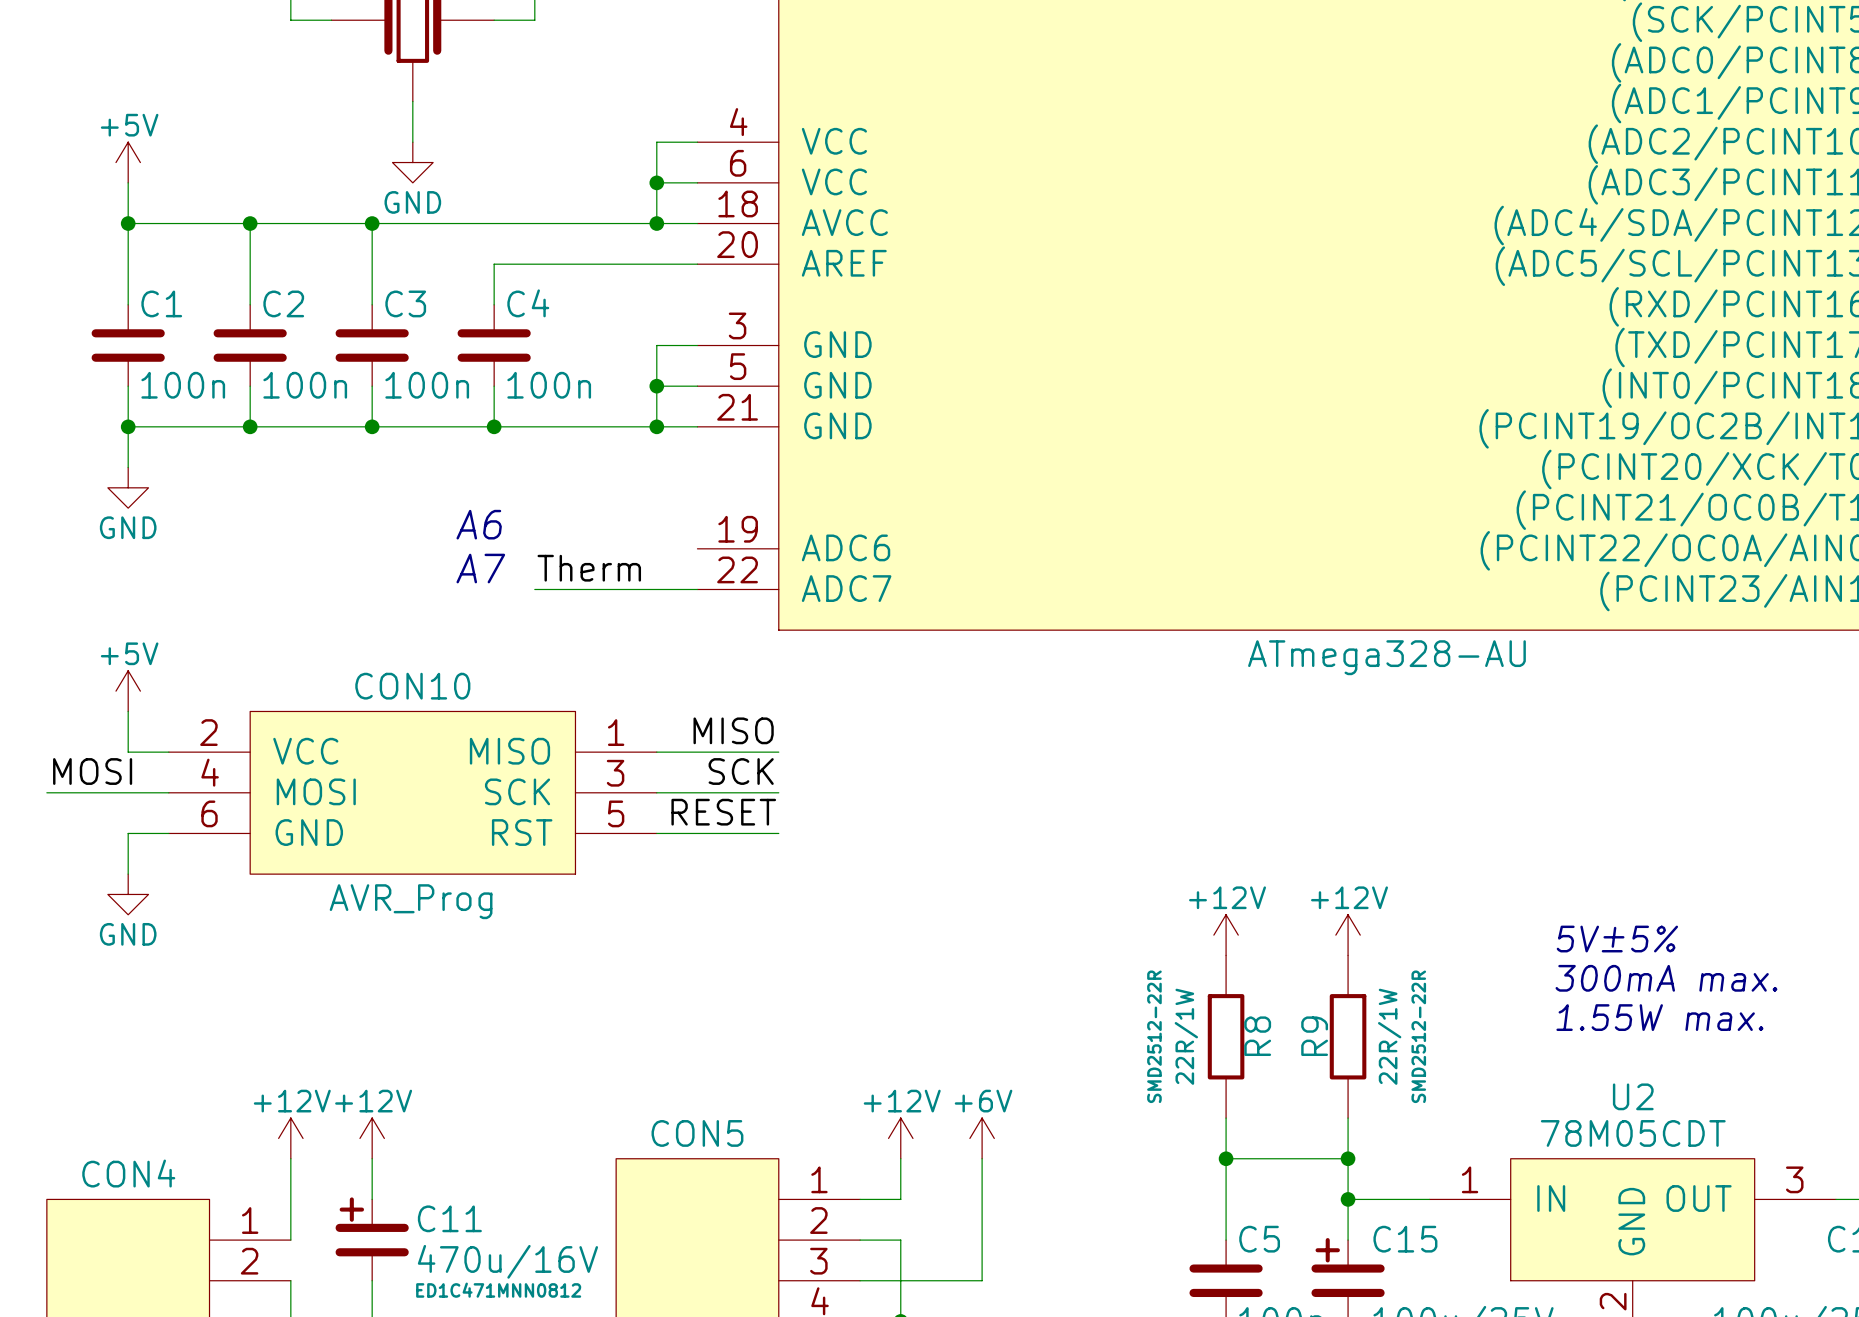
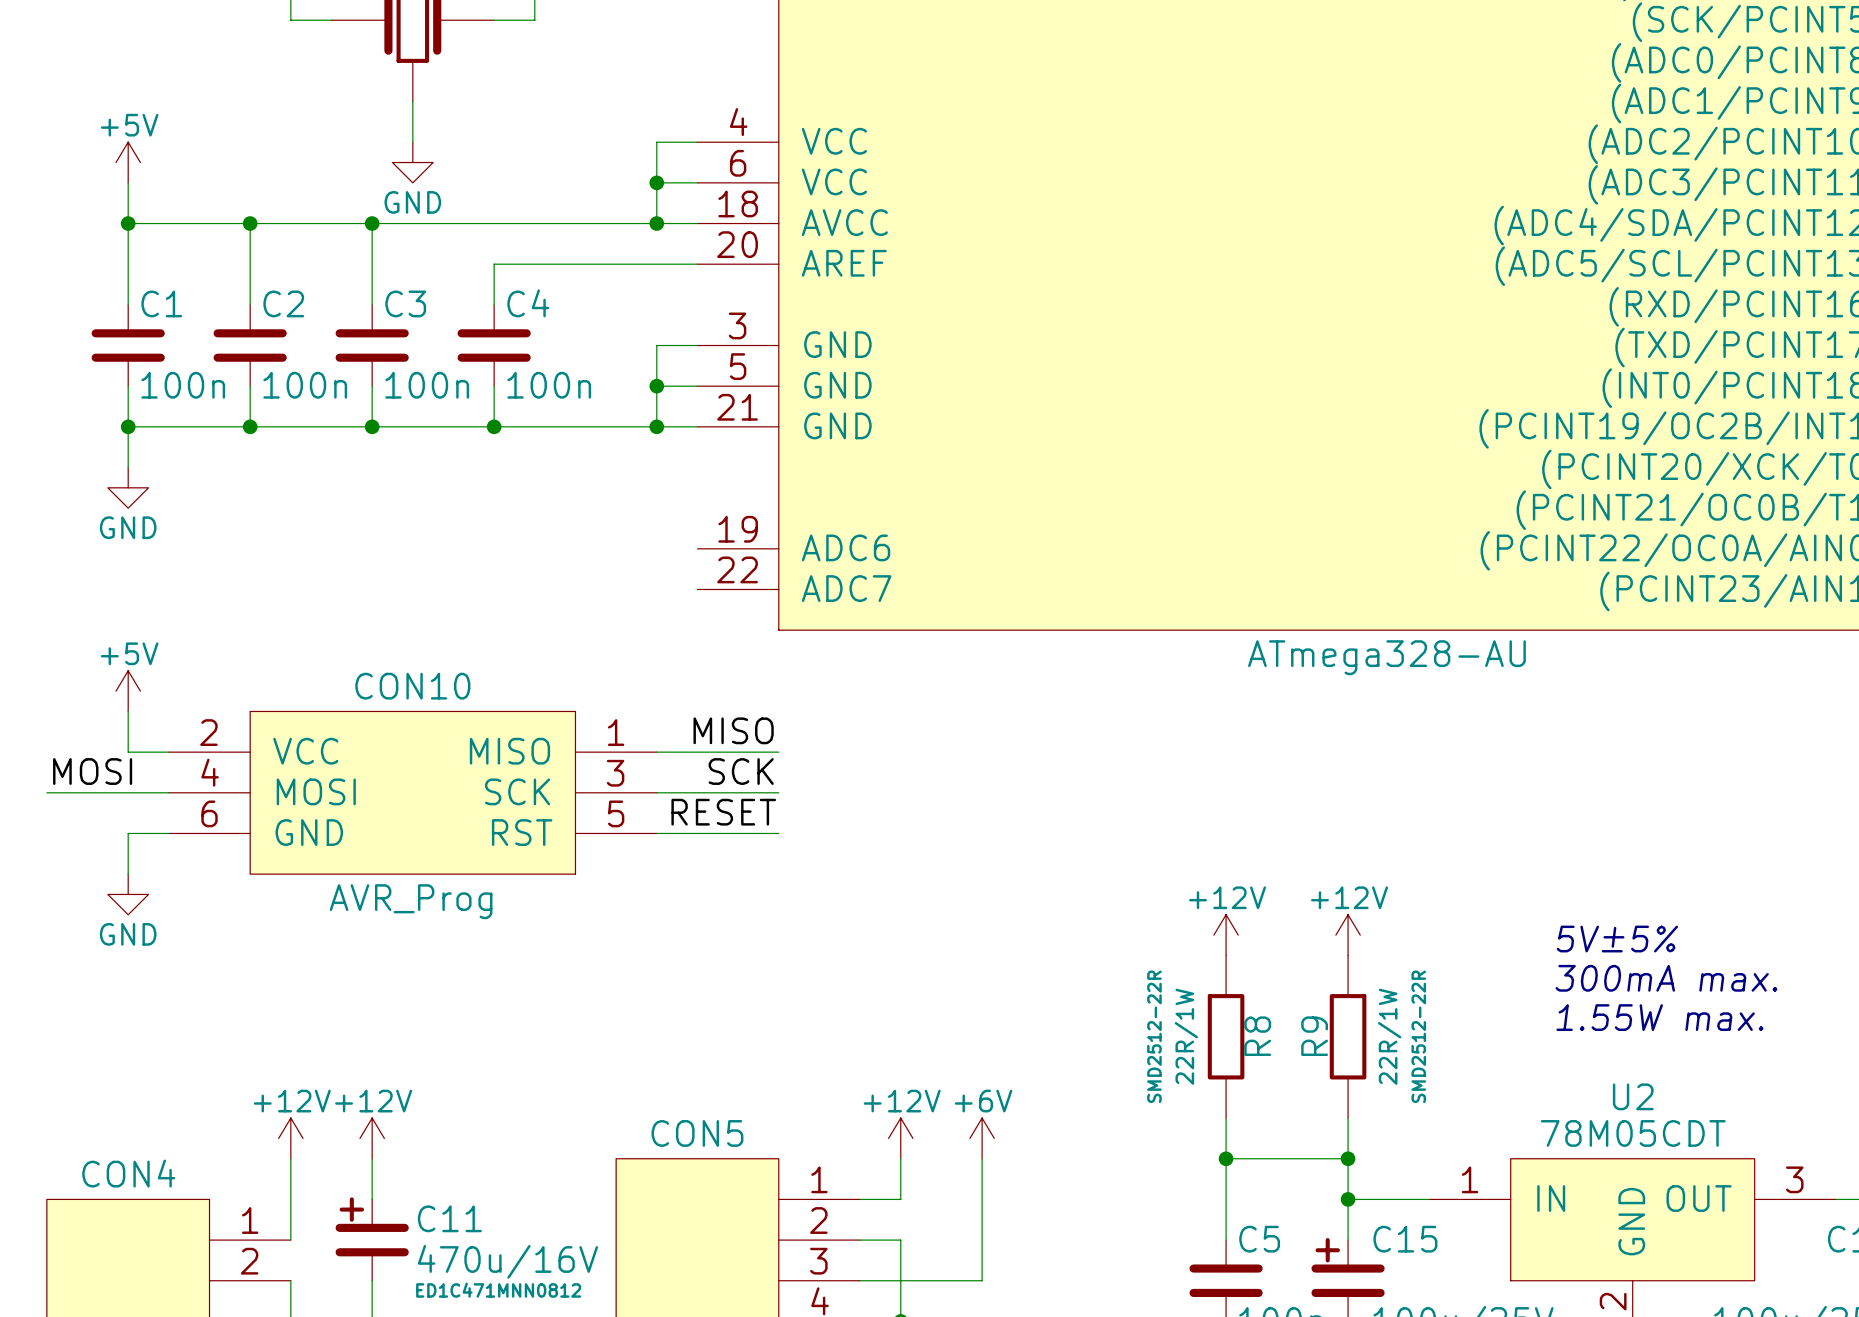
text: A6 (479, 524) -> none
text: A7 (480, 568) -> none
label: Therm (589, 568) -> none
wire: (534, 589) (697, 589) -> none

